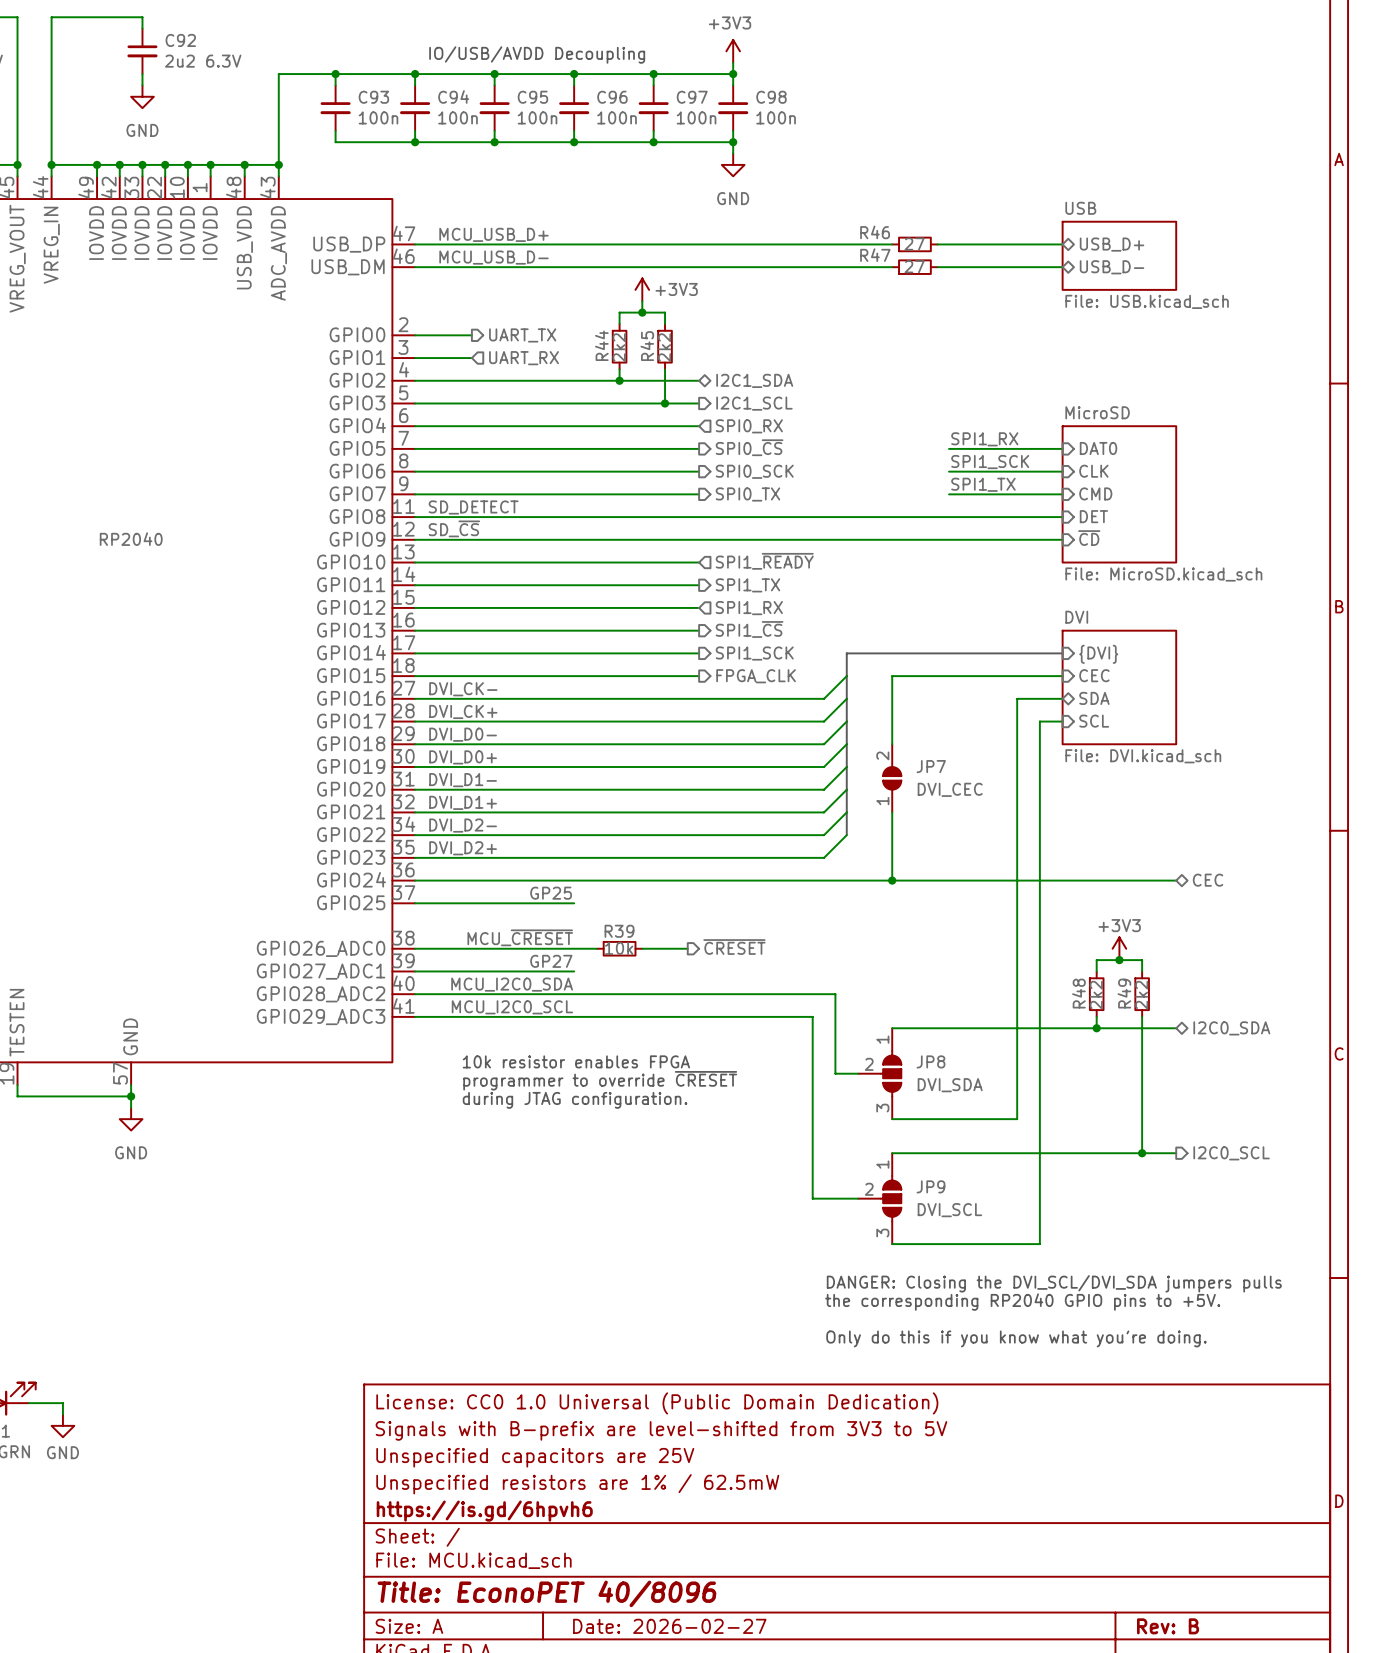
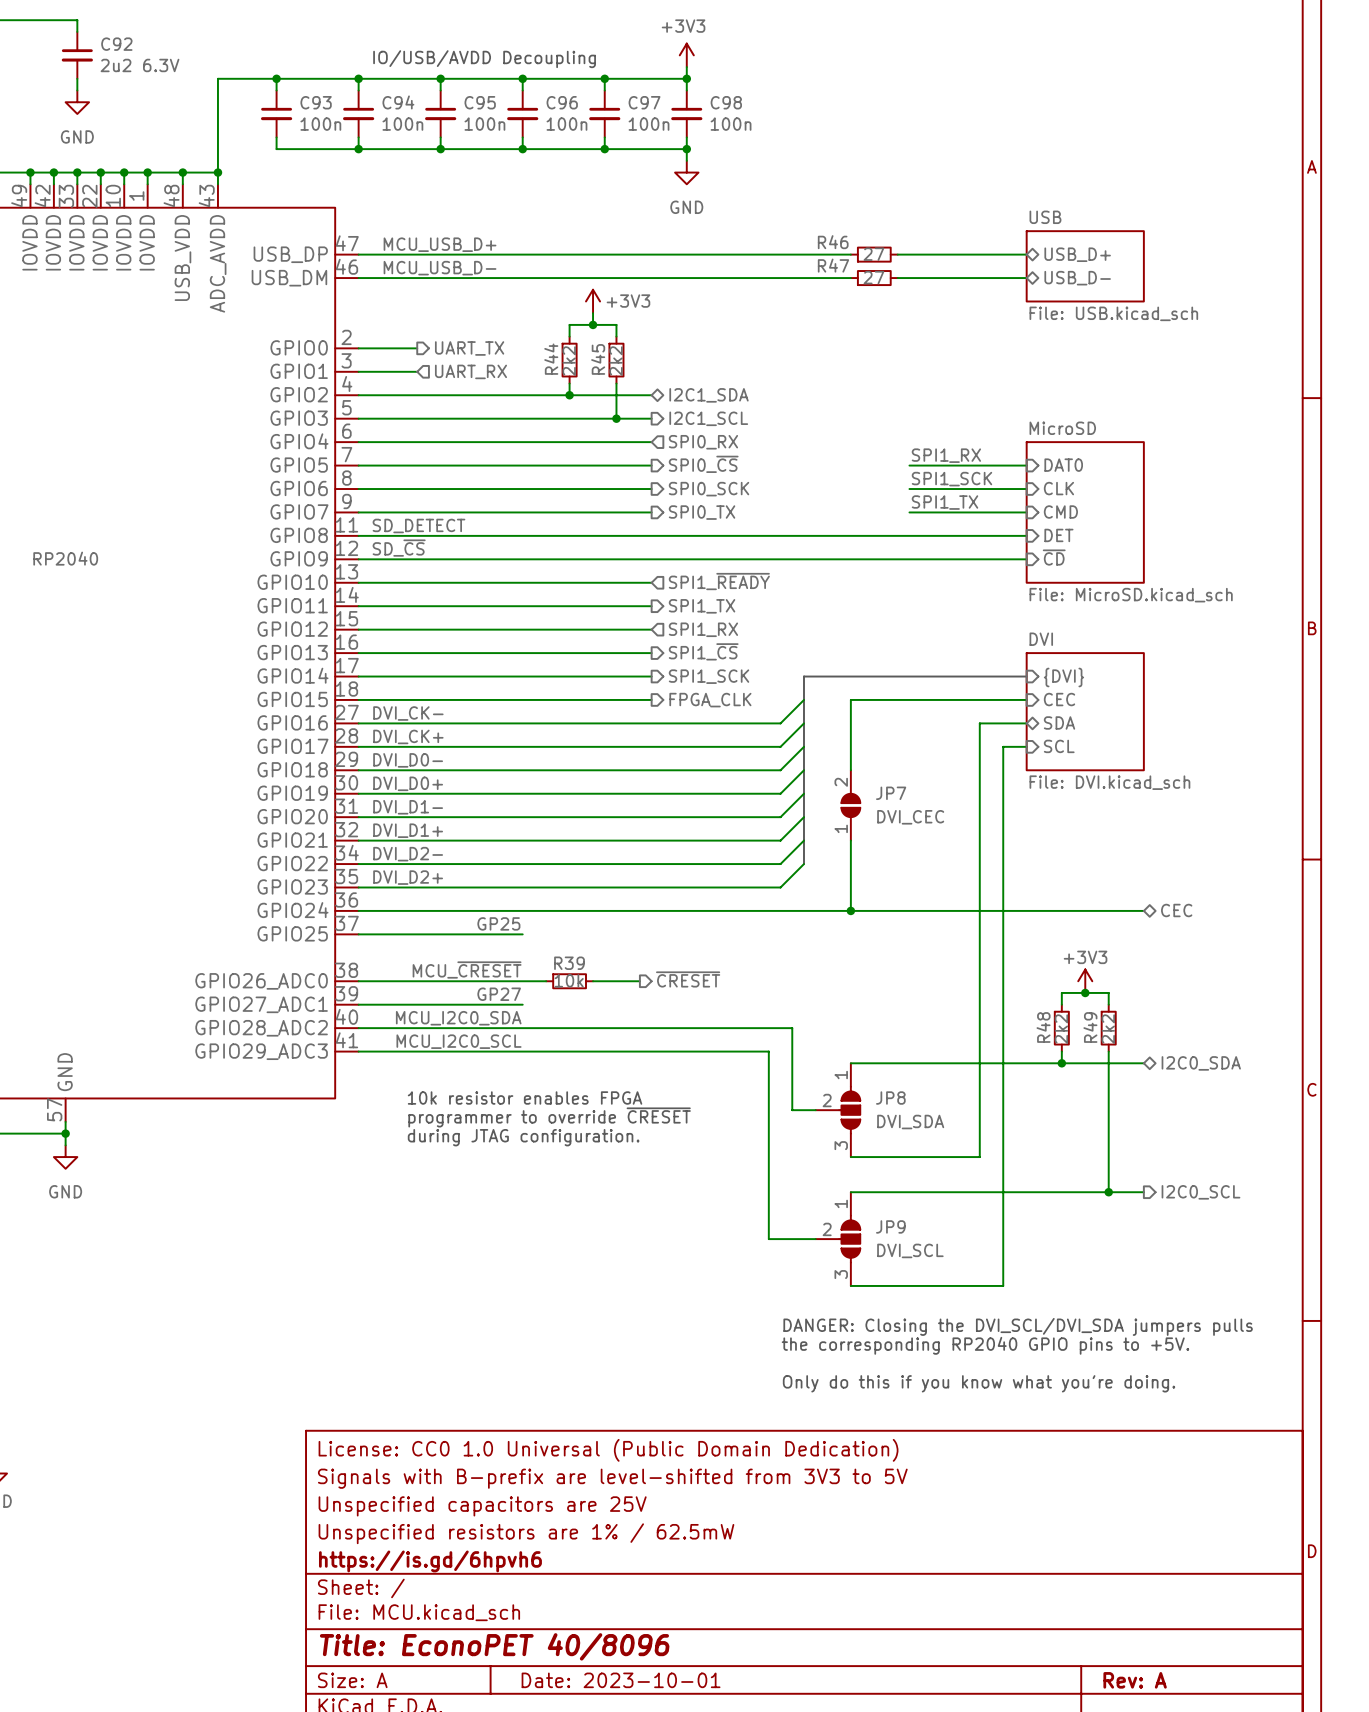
title block: Date: 2026-02-27 (669, 1626) -> Date: 2023-10-01 (621, 1680)
title block: Rev: B (1168, 1626) -> Rev: A (1135, 1680)

